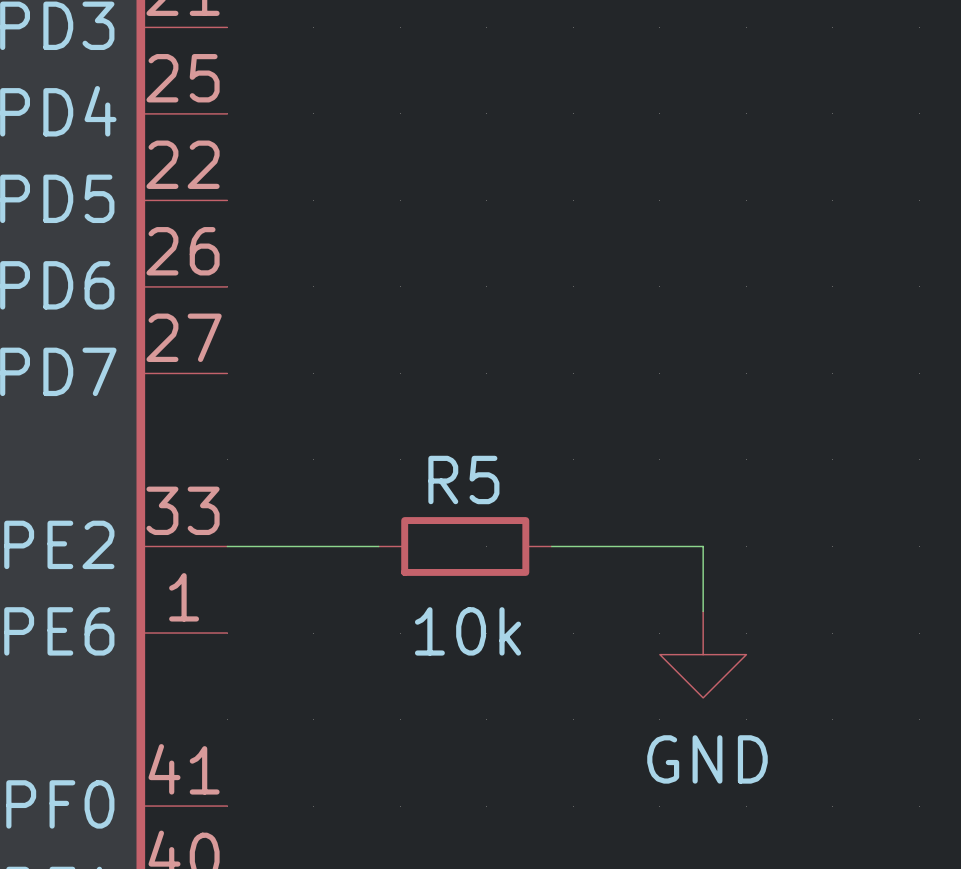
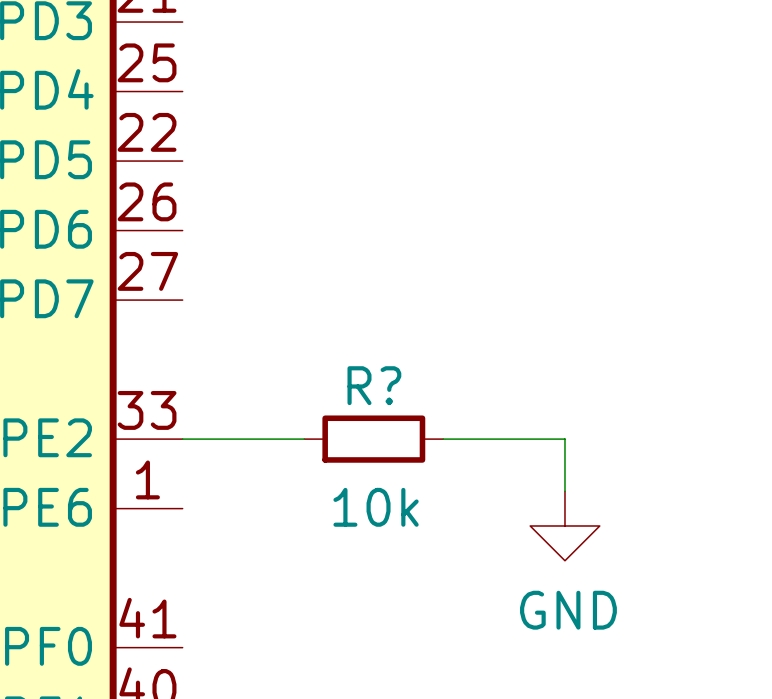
R5 name: R5 (463, 479) -> R? (374, 385)

